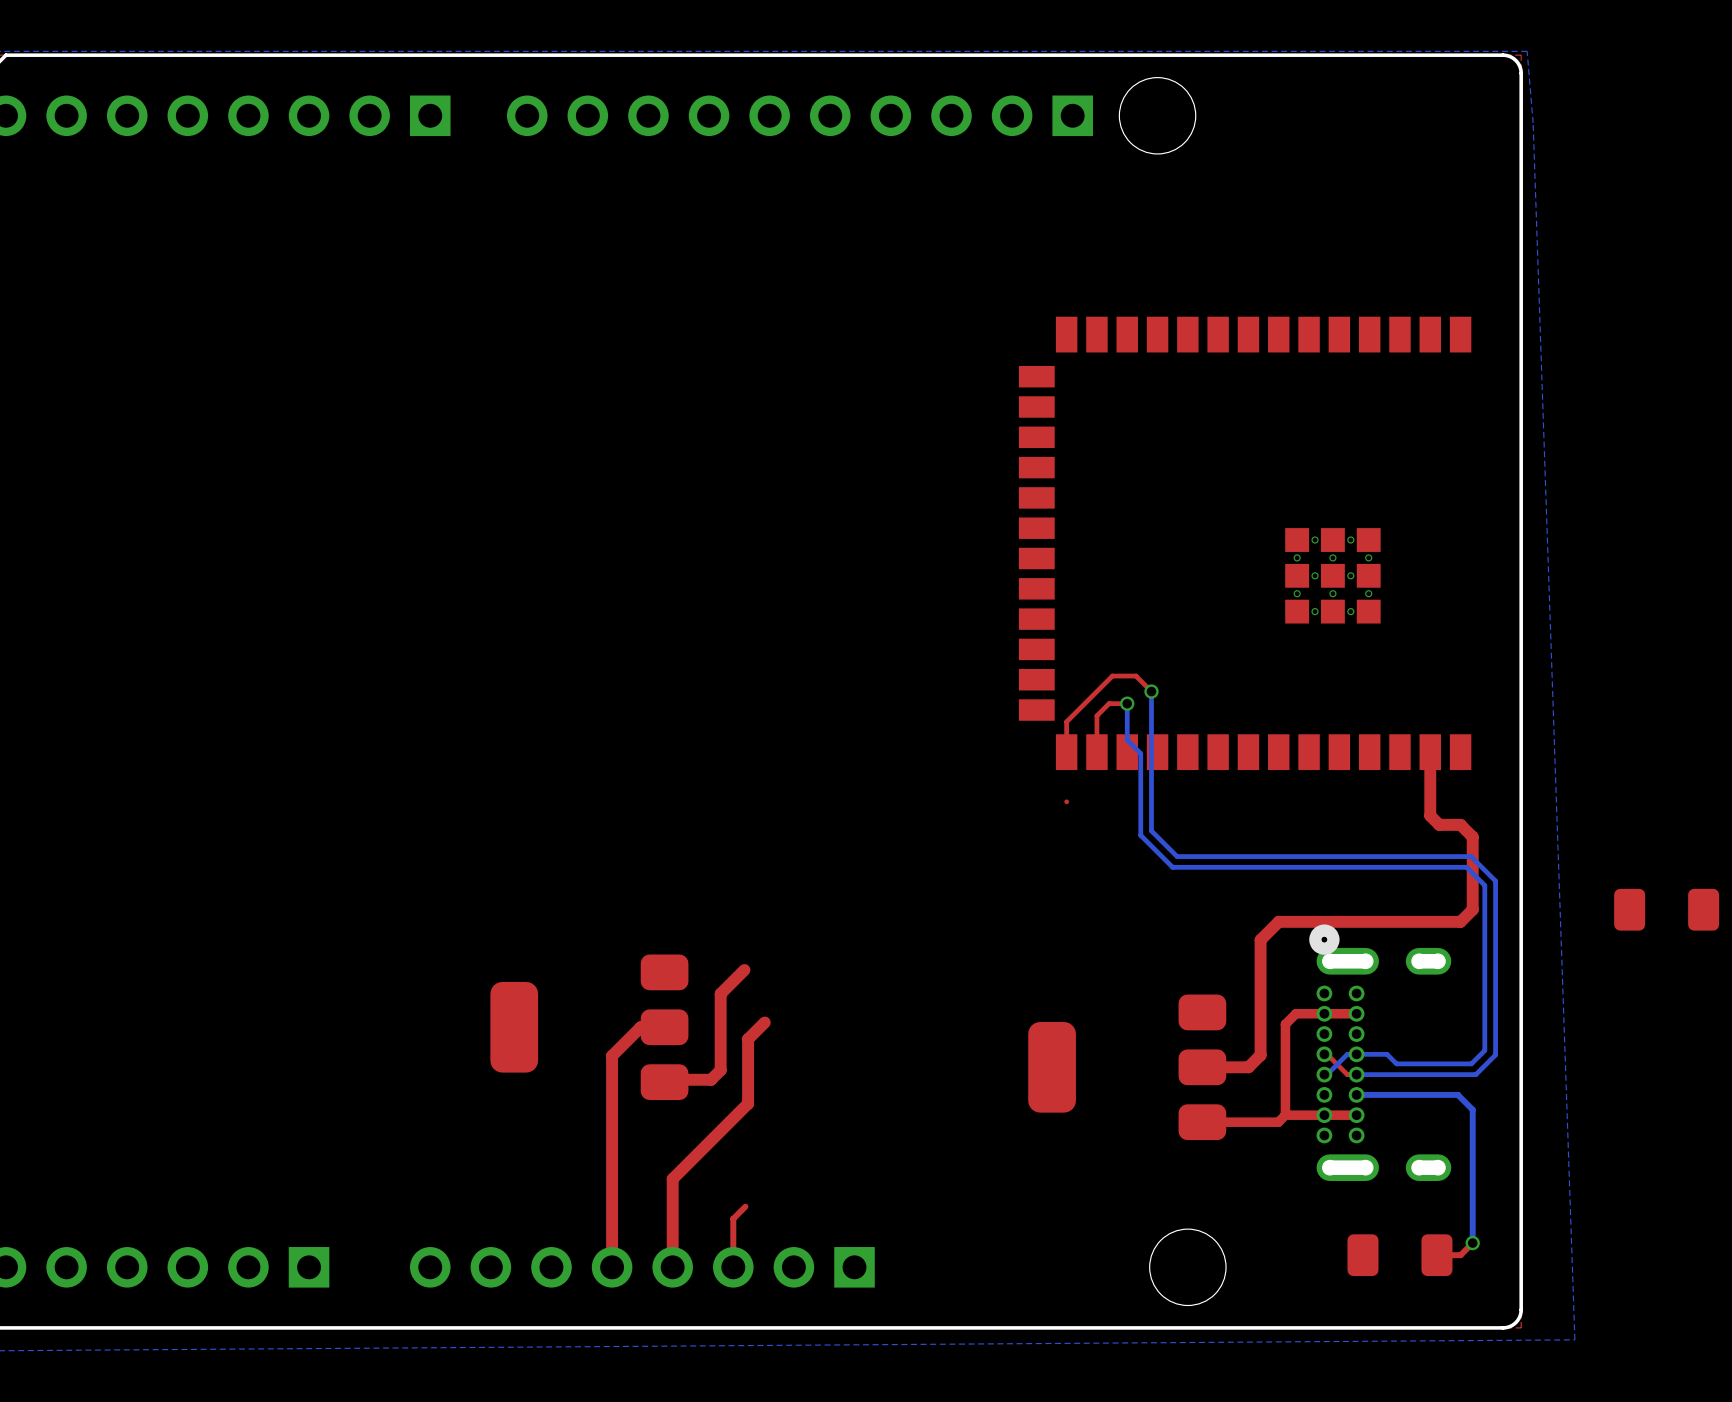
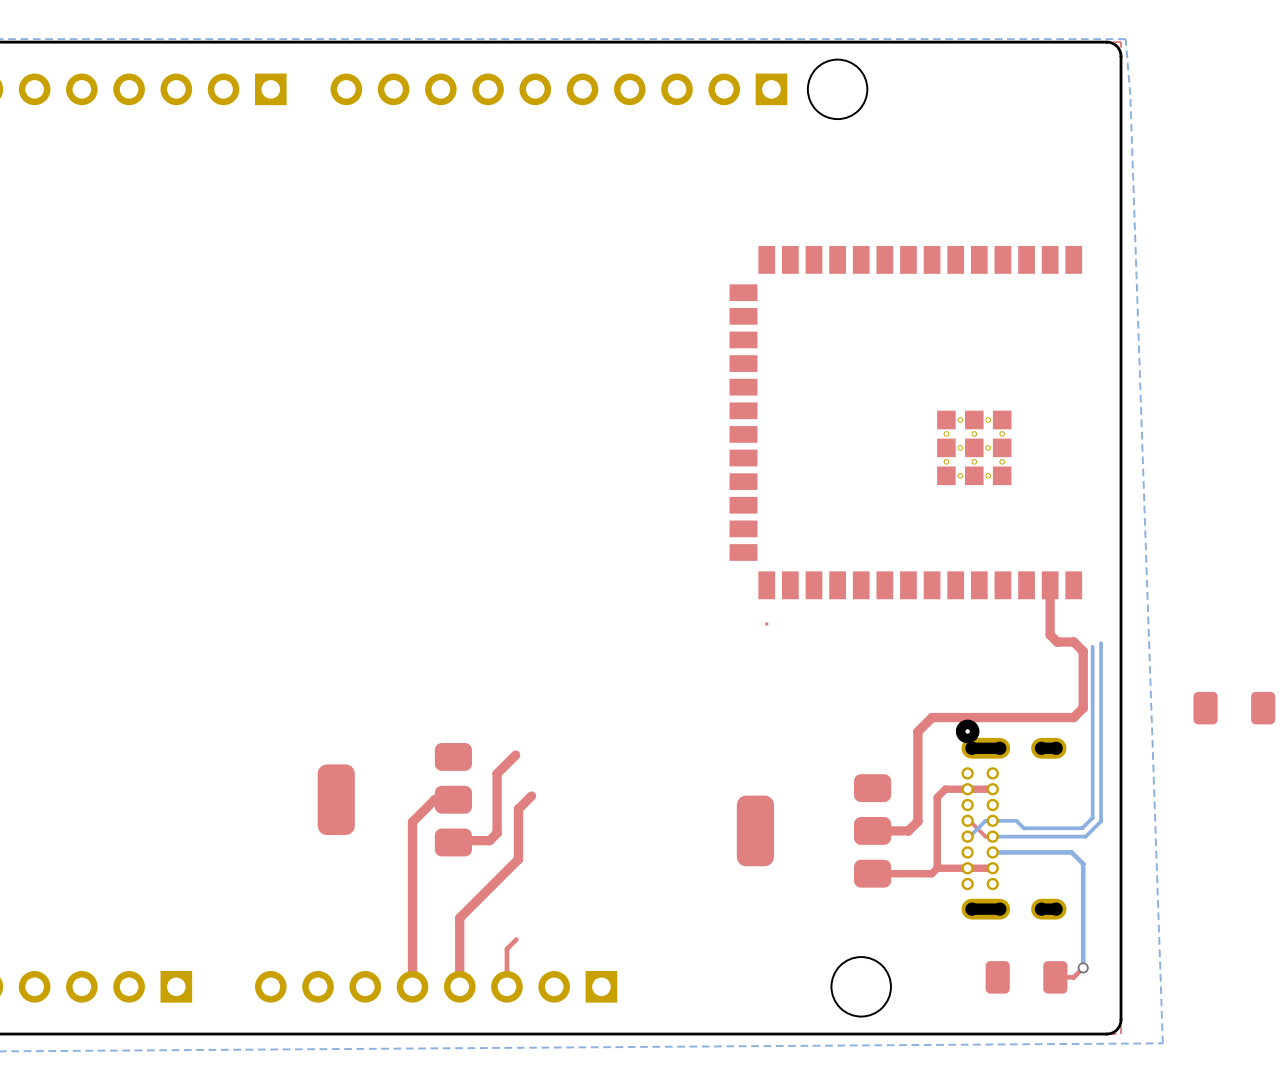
top track: (1151, 691) (1135, 676) (1112, 676) (1066, 721) (1066, 752) -> none
bottom track: (1151, 691) (1151, 830) (1177, 856) (1471, 856) (1495, 881) -> (1101, 643) (1101, 685)
via: (1151, 691) -> none
top track: (1127, 703) (1109, 703) (1096, 715) (1096, 752) -> none
bottom track: (1127, 703) (1127, 740) (1140, 753) (1140, 835) (1172, 867) (1466, 867) (1484, 885) -> (1092, 646) (1092, 689)
via: (1127, 703) -> none

